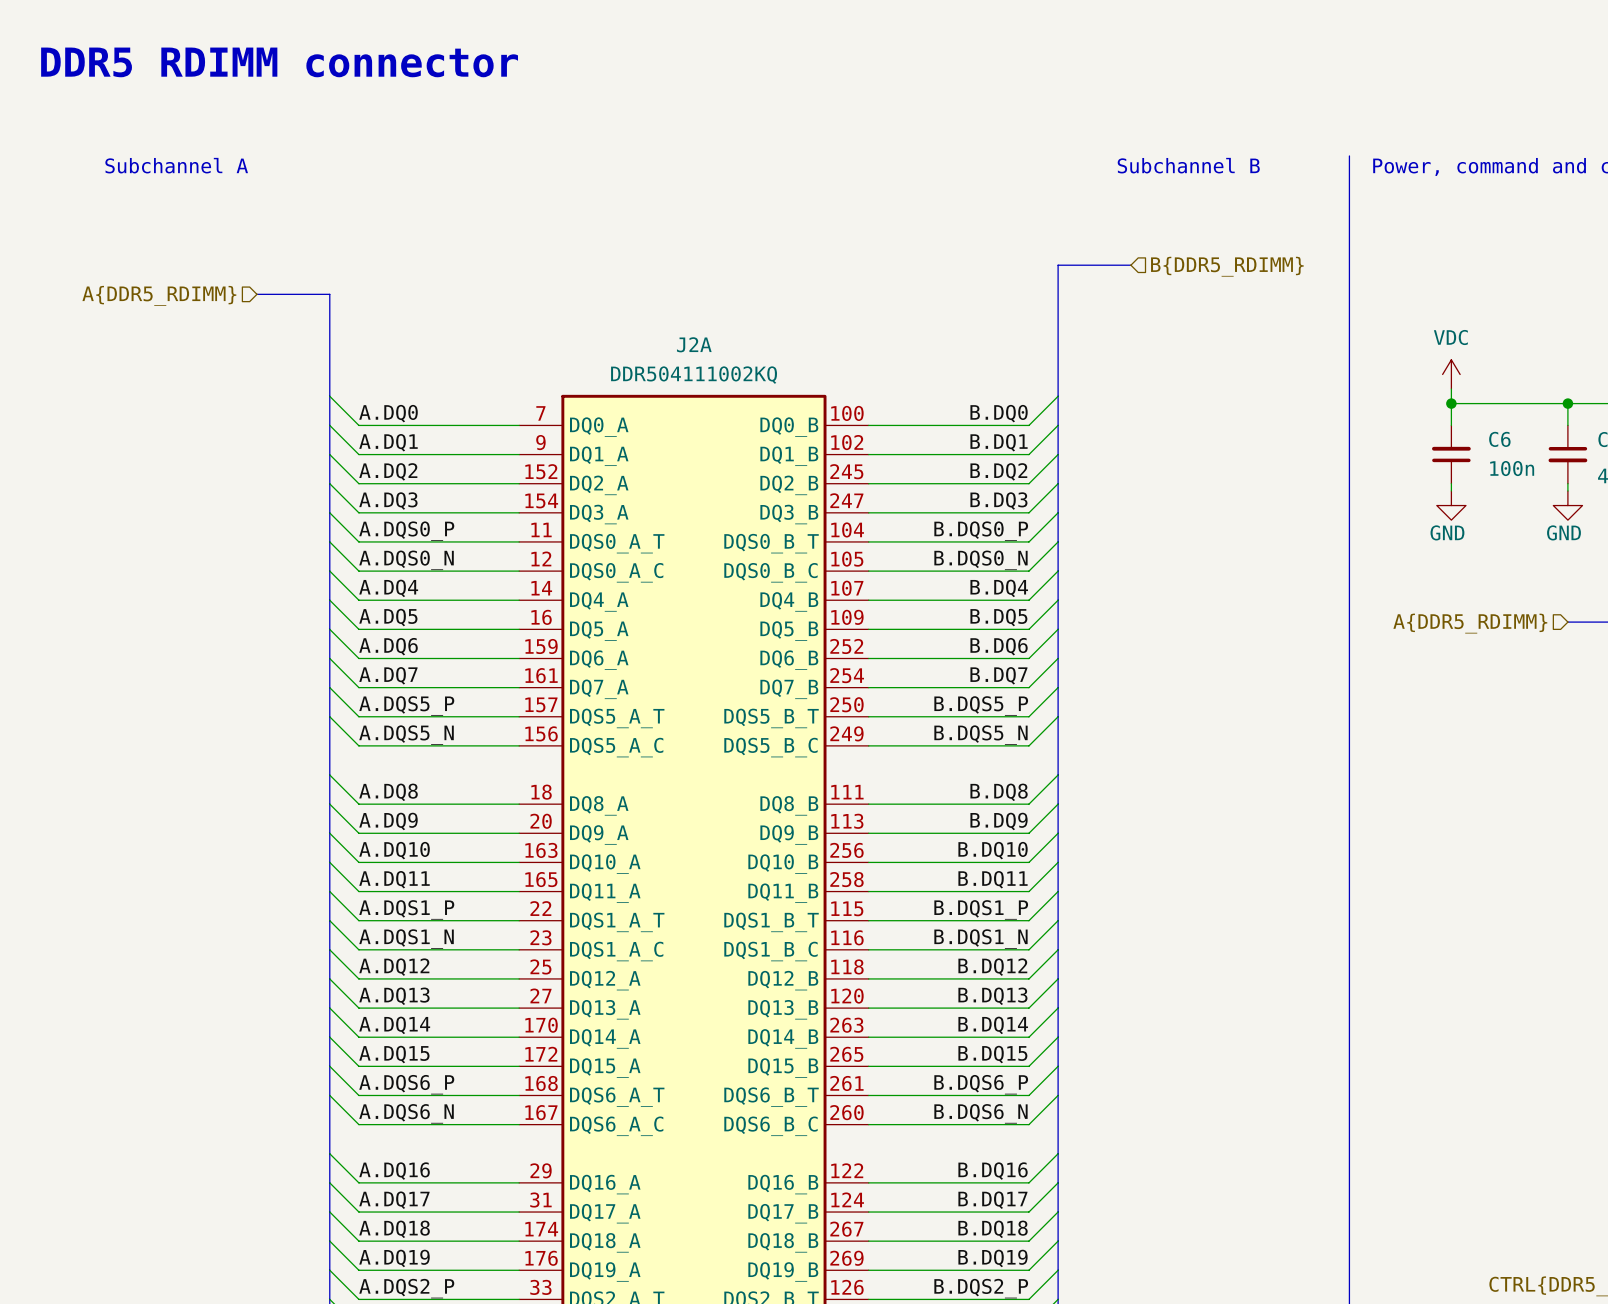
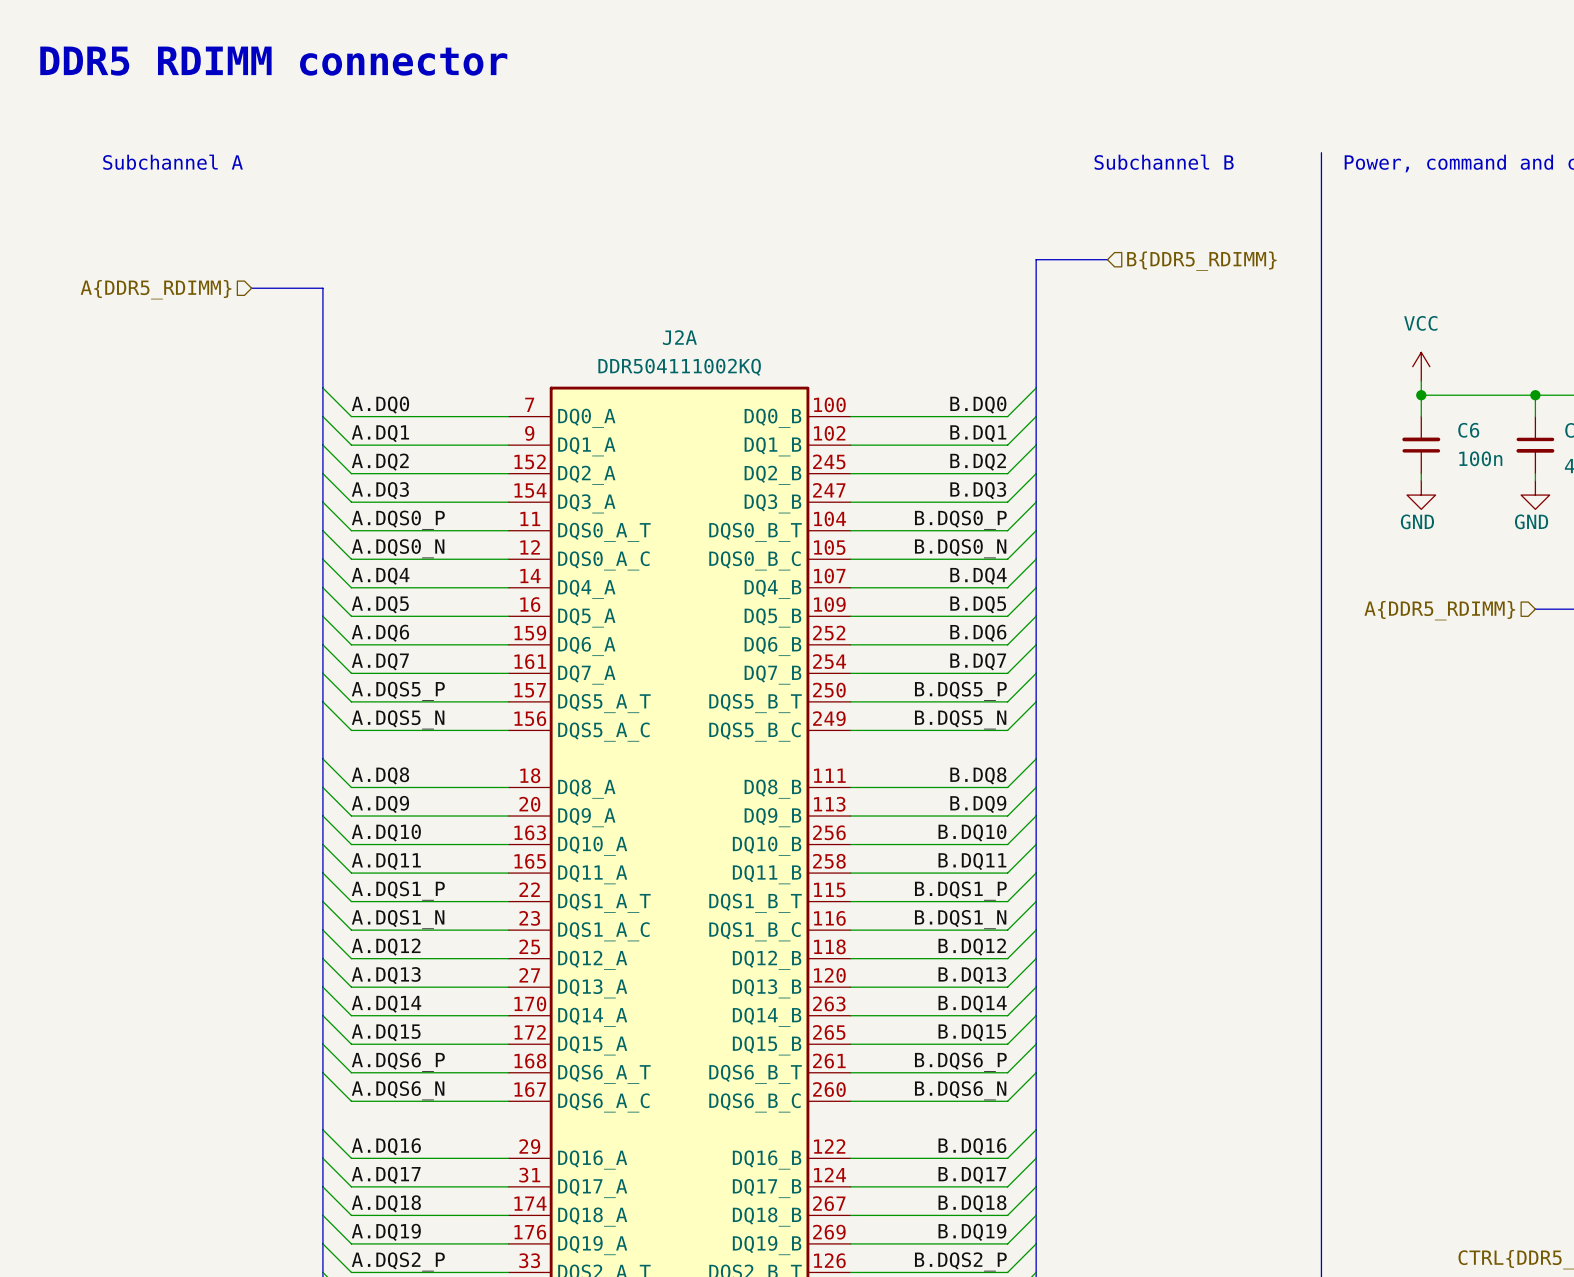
power symbol: VDC (1451, 374) -> VCC (1421, 366)

